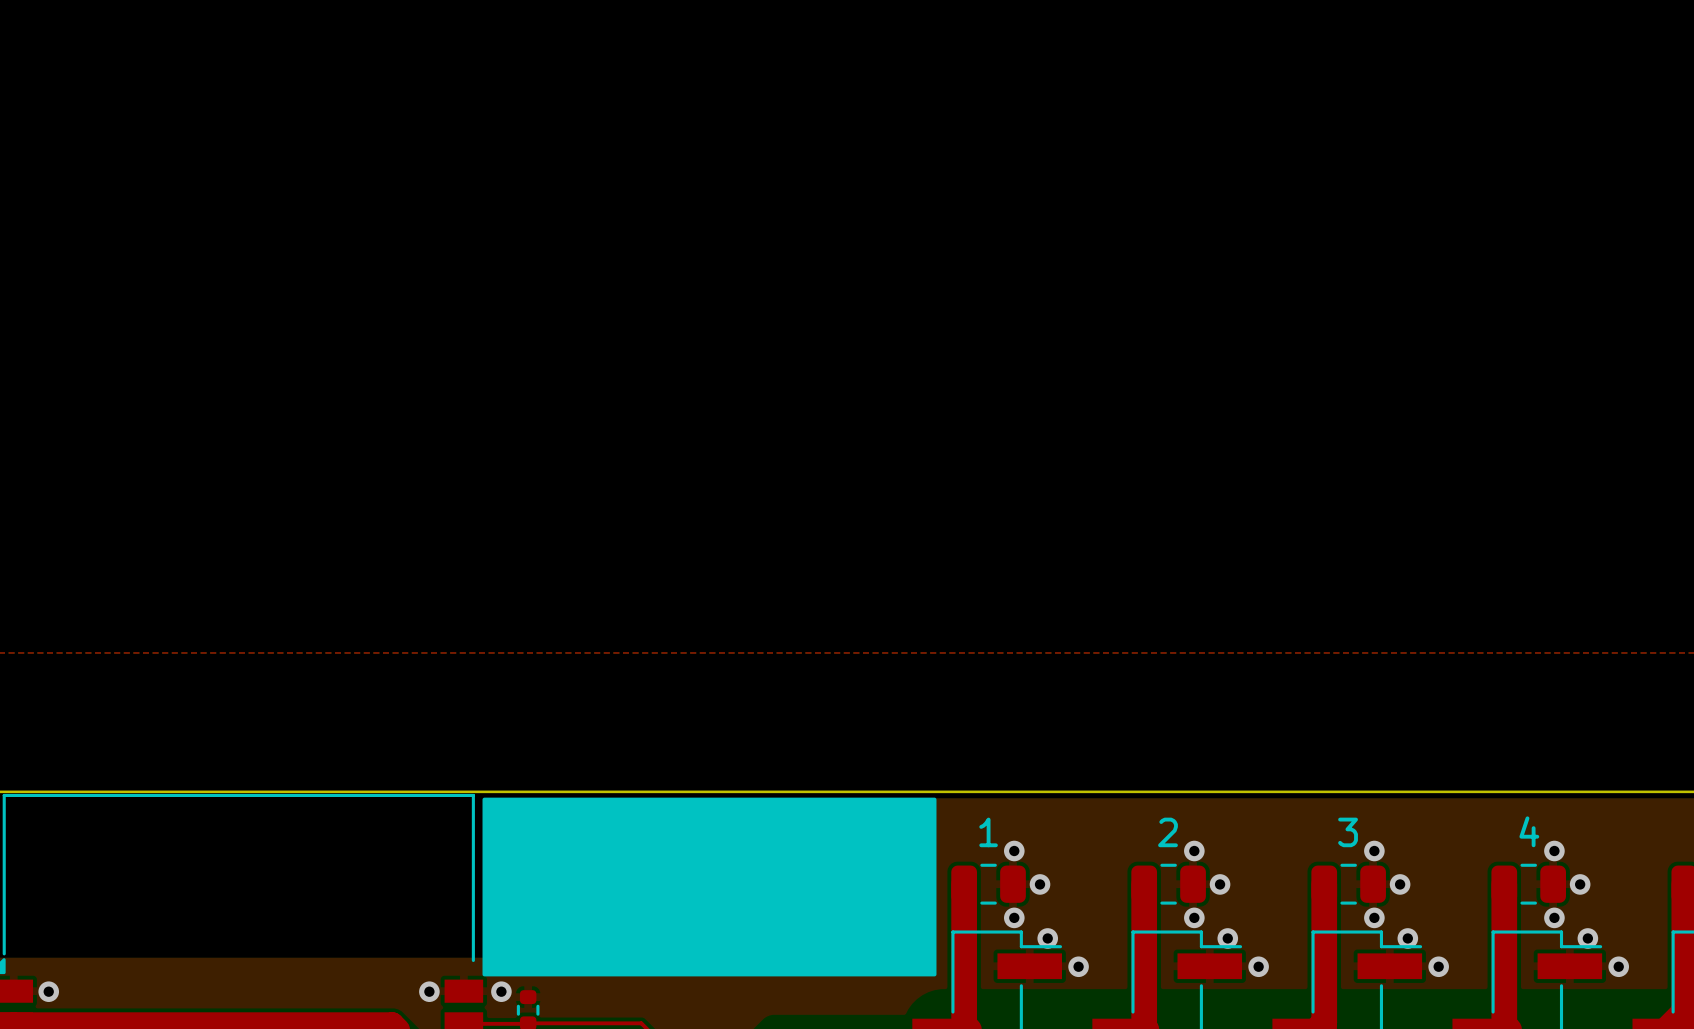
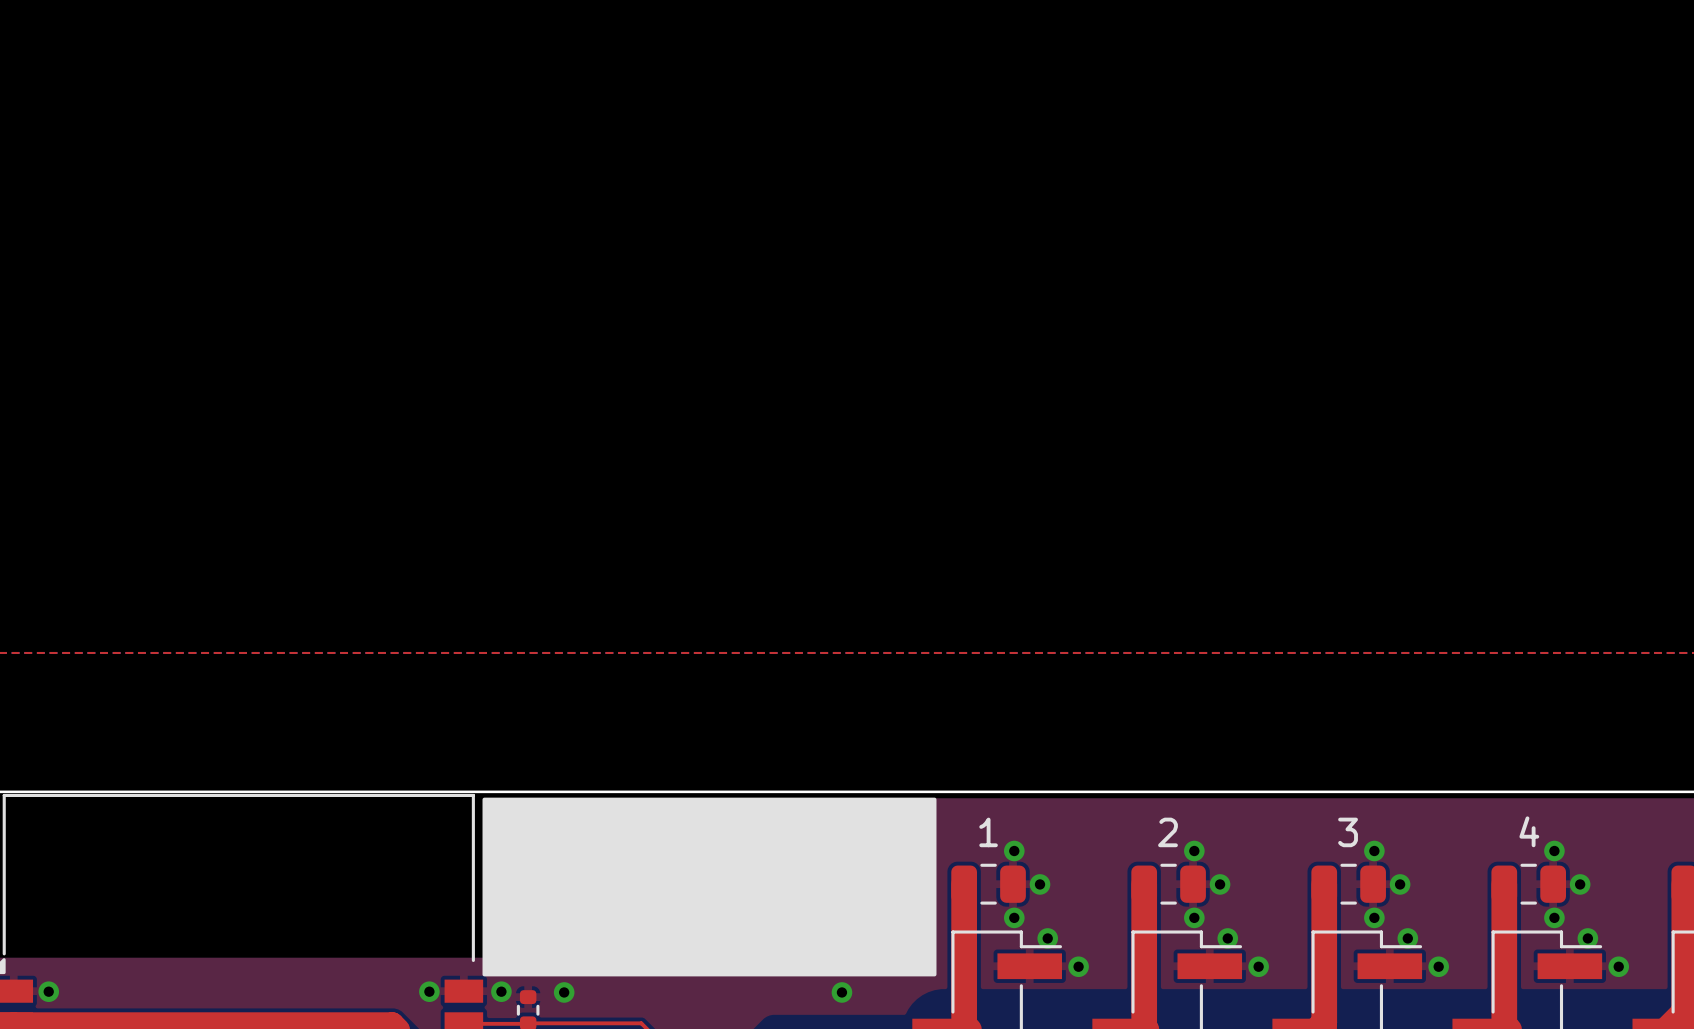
via: none -> (564, 992)
via: none -> (841, 992)

